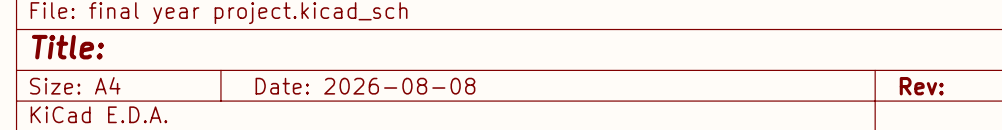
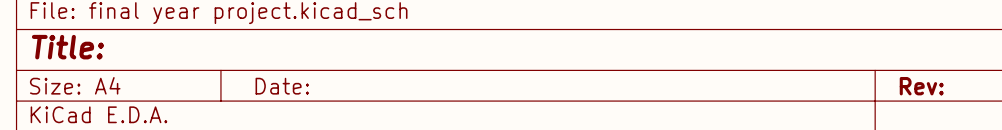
title block: Date: 2026-08-08 (365, 86) -> Date: (282, 86)

